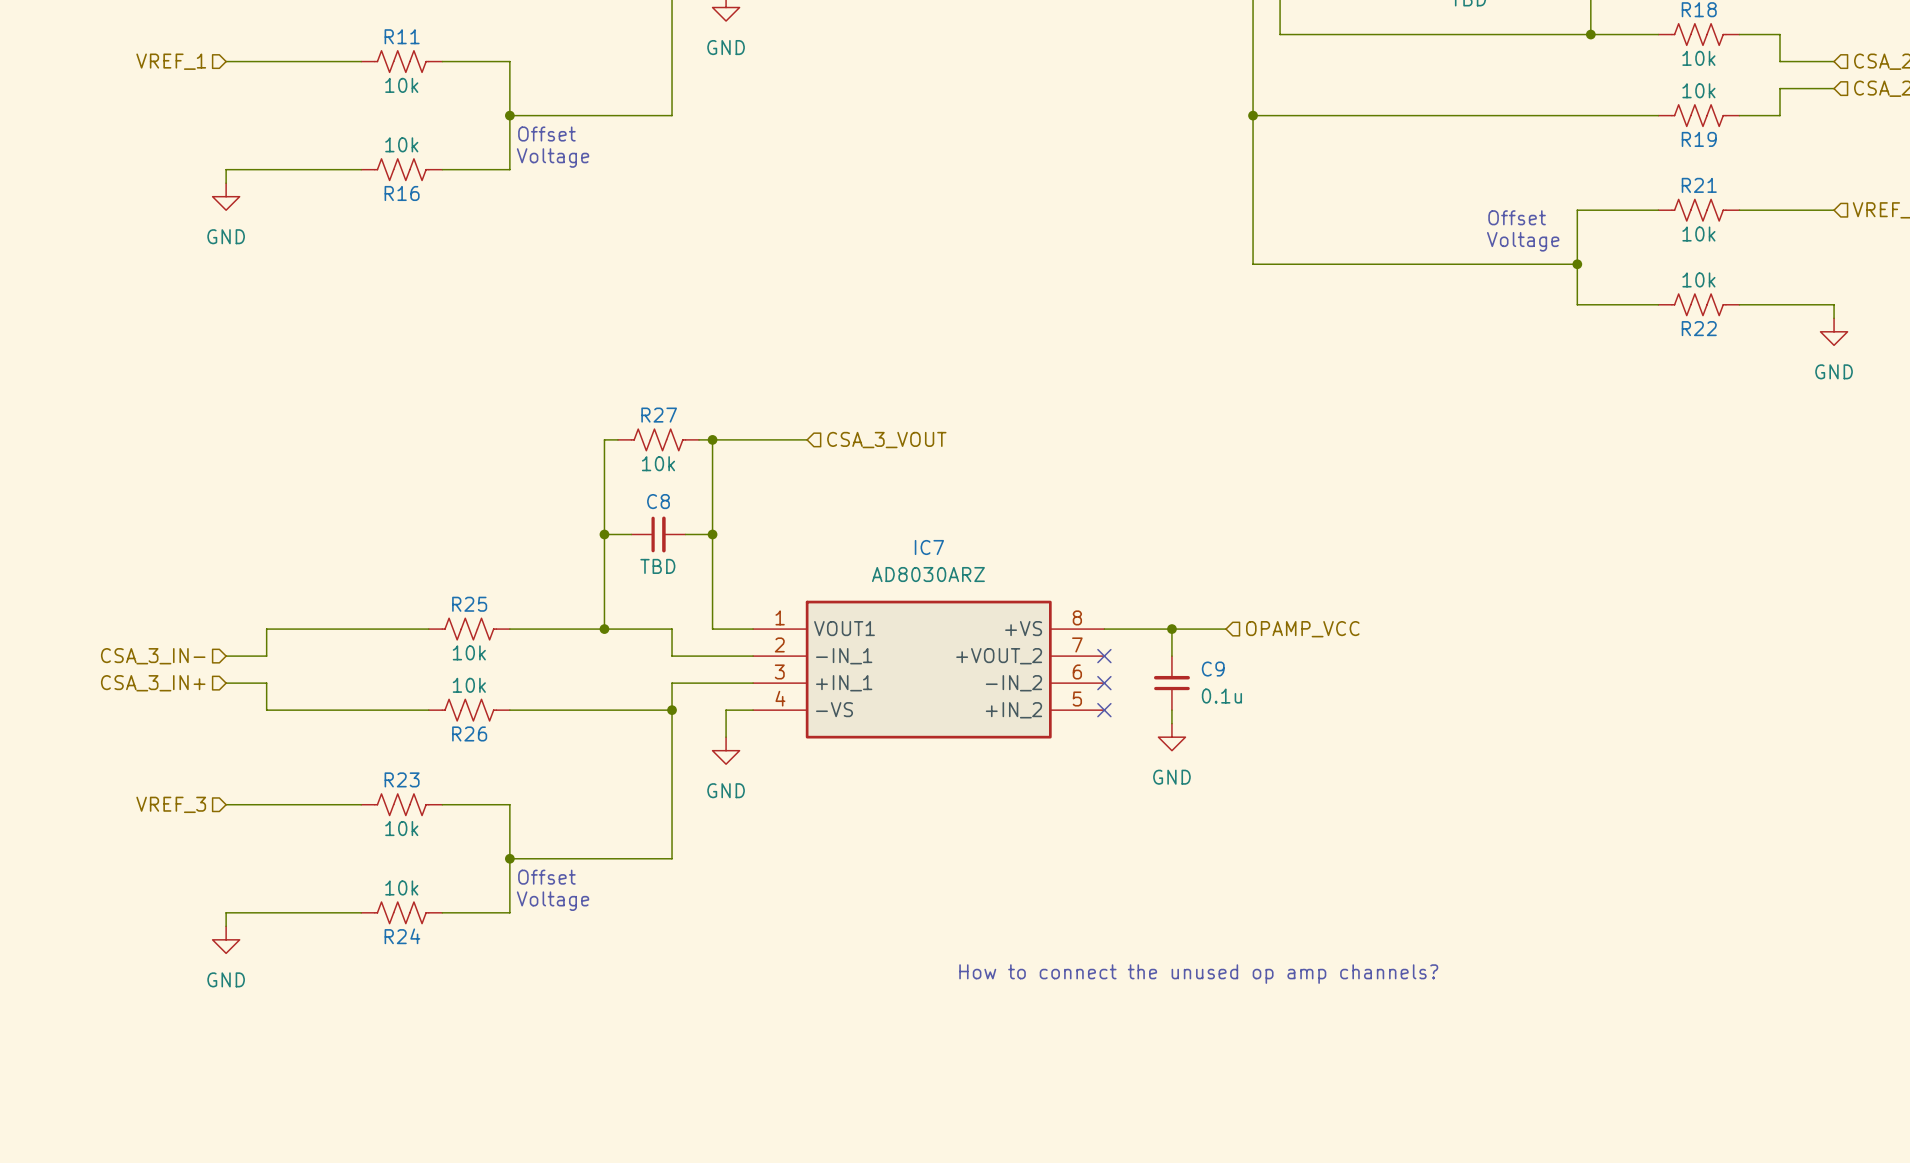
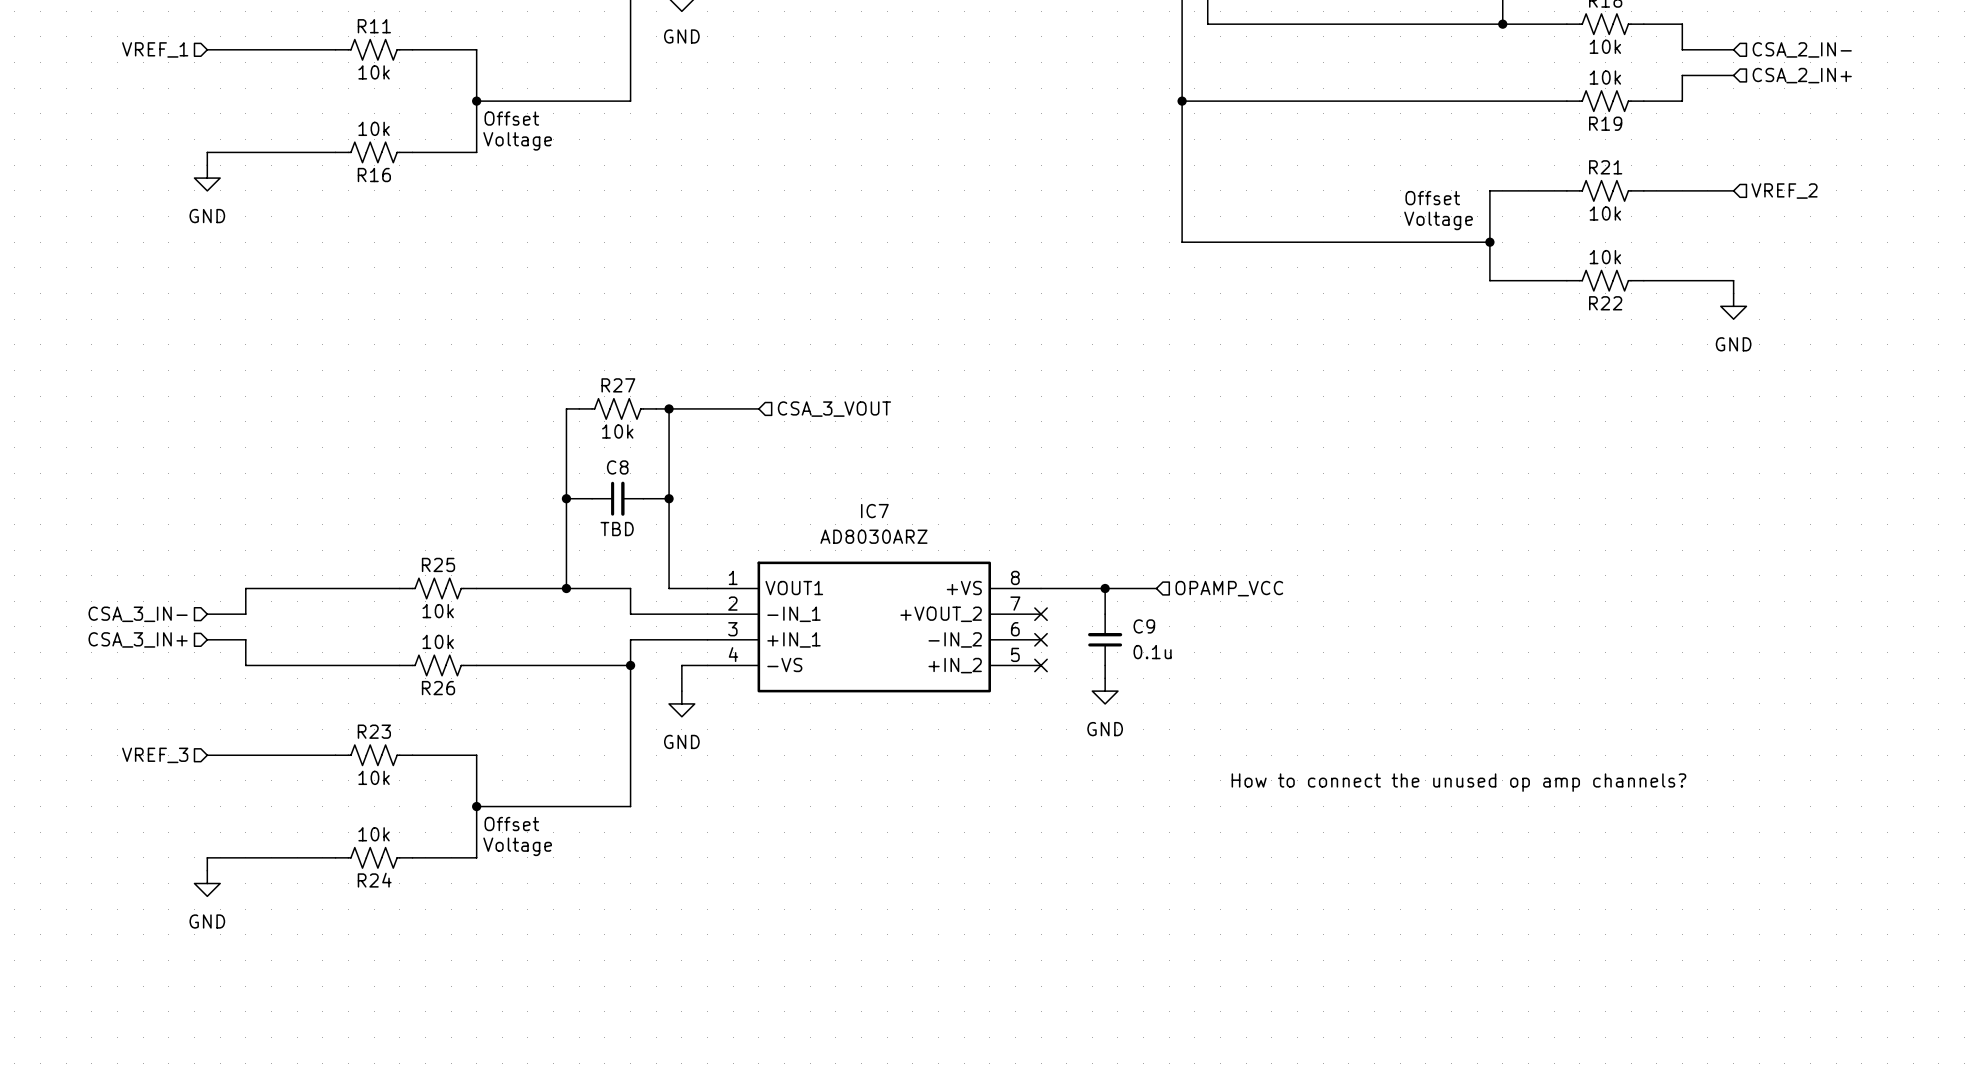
text: none -> How to connect the unused op amp channels? (1458, 782)
text: How to connect the unused op amp channels? (1198, 974) -> none

